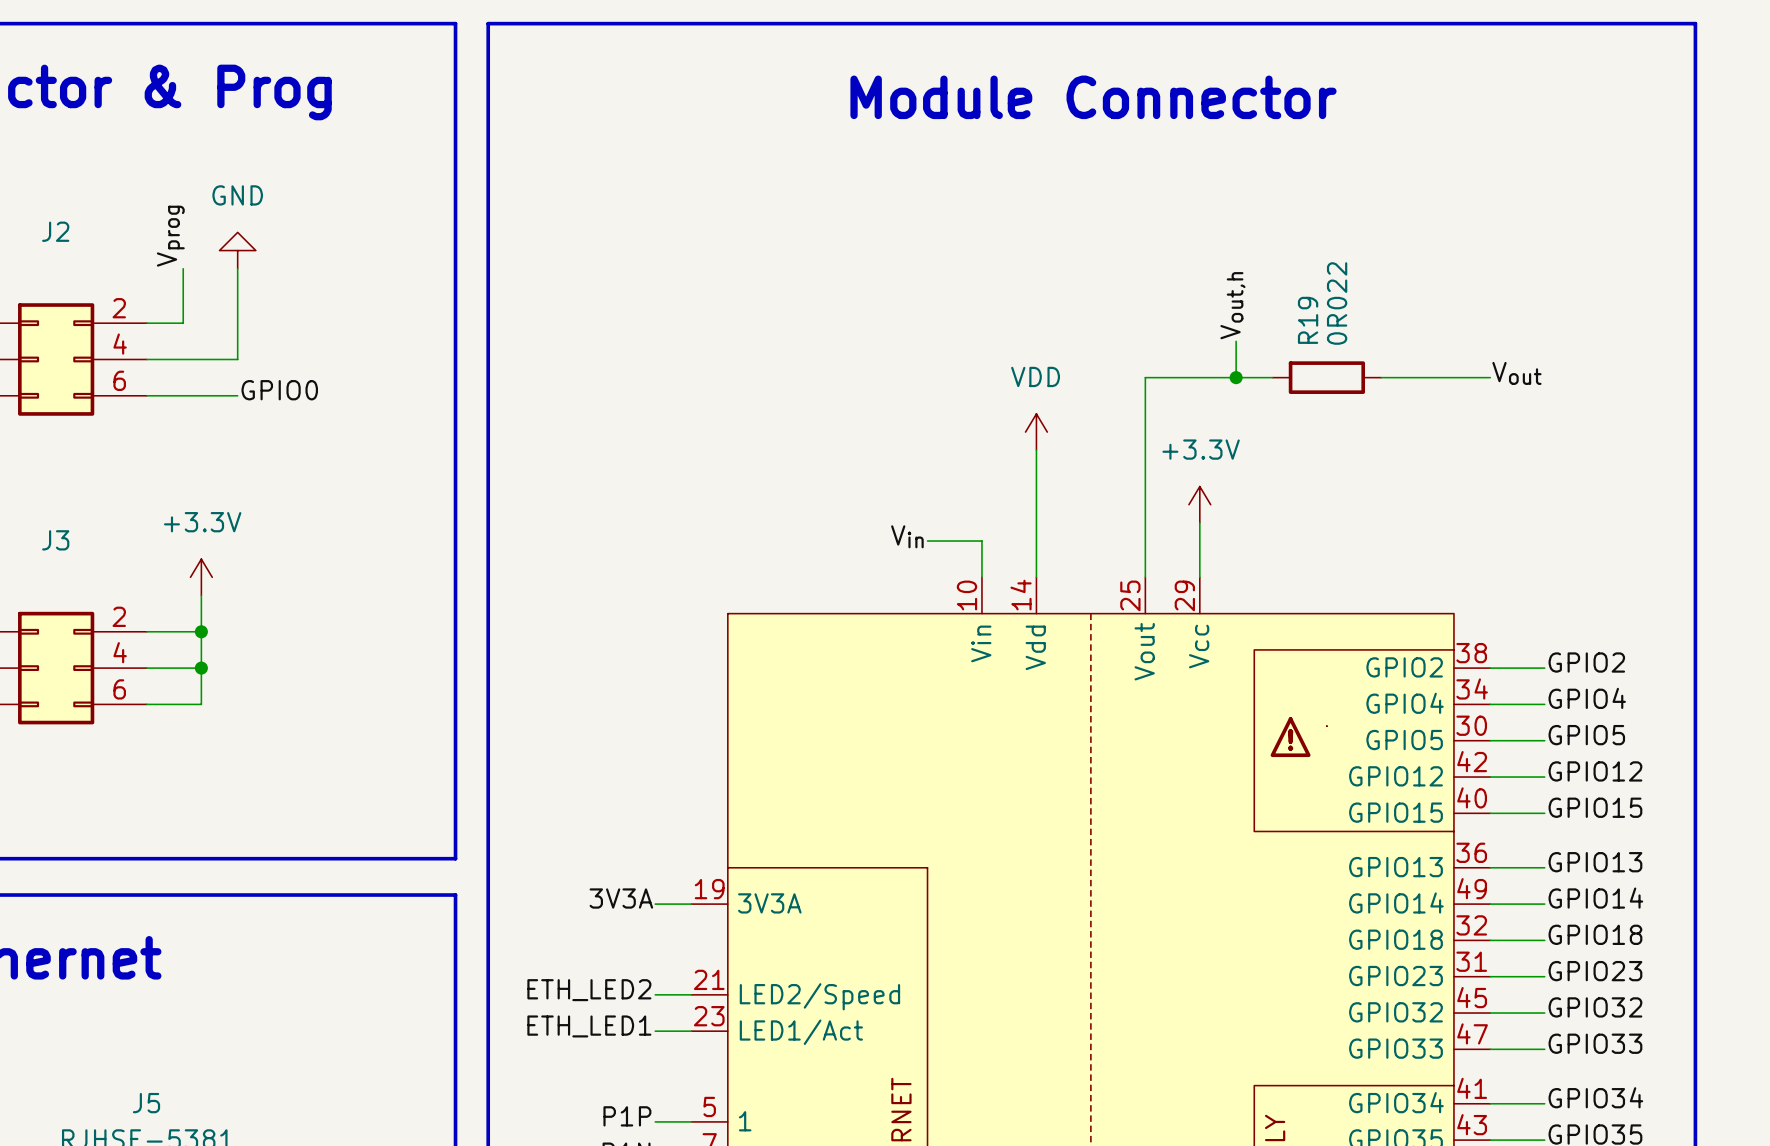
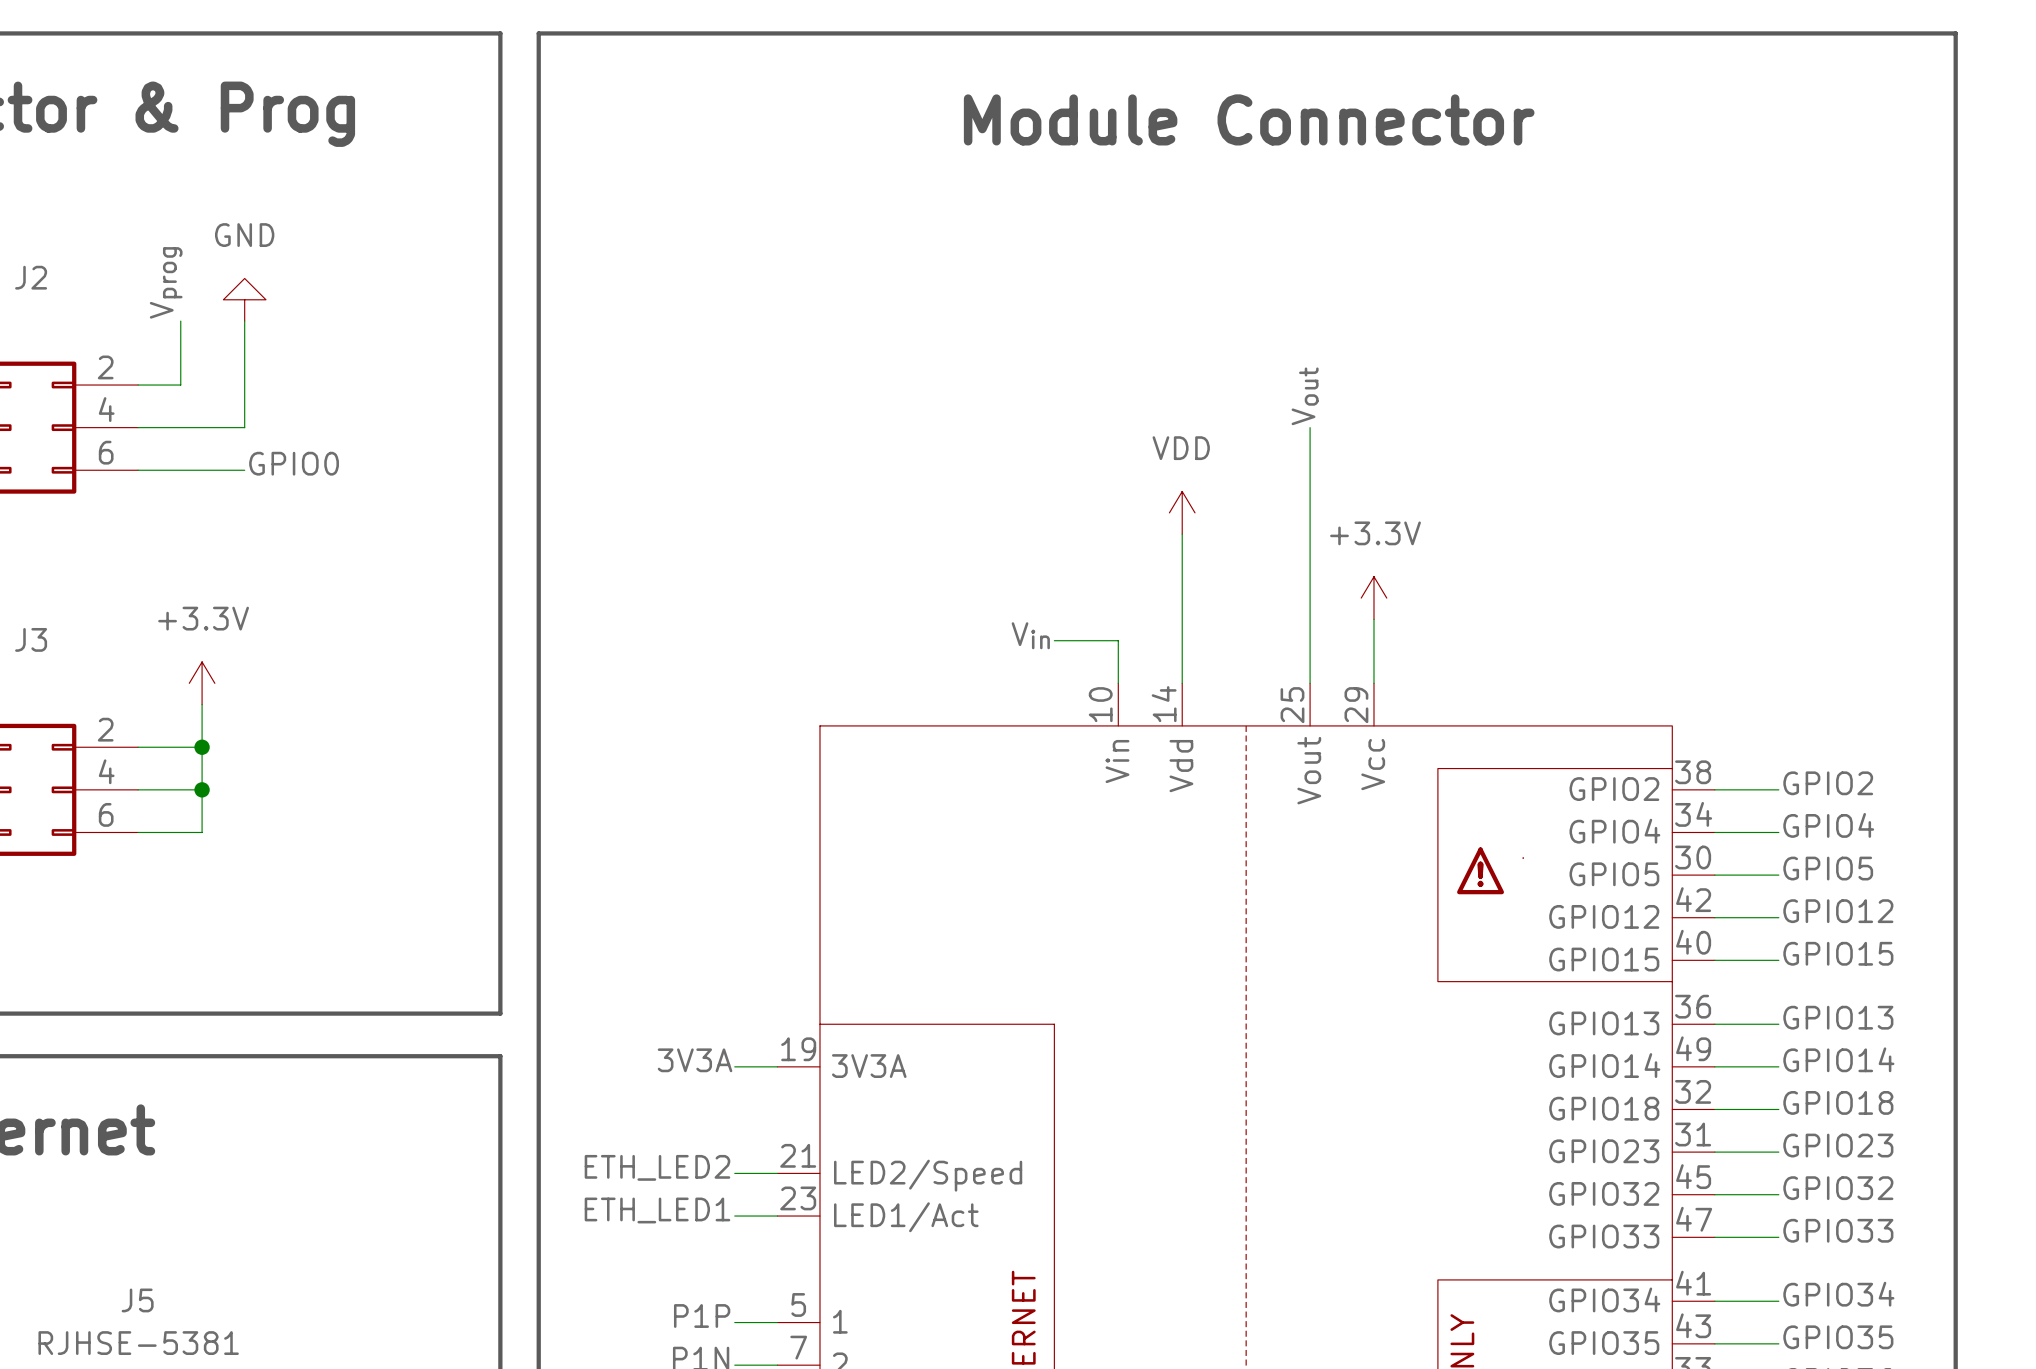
label: Vout,h (1232, 305) -> none
wire: (1236, 341) (1236, 377) -> none
label rotation: 0° (1516, 373) -> 90° counterclockwise (1305, 396)
label position: Vout (1516, 373) -> Vout (1305, 396)
wire: (1145, 377) (1272, 377) -> (1310, 448) (1310, 427)
junction: (1236, 377) -> none
R19: 0R022 (1326, 377) -> none
wire: (1381, 377) (1490, 377) -> none

